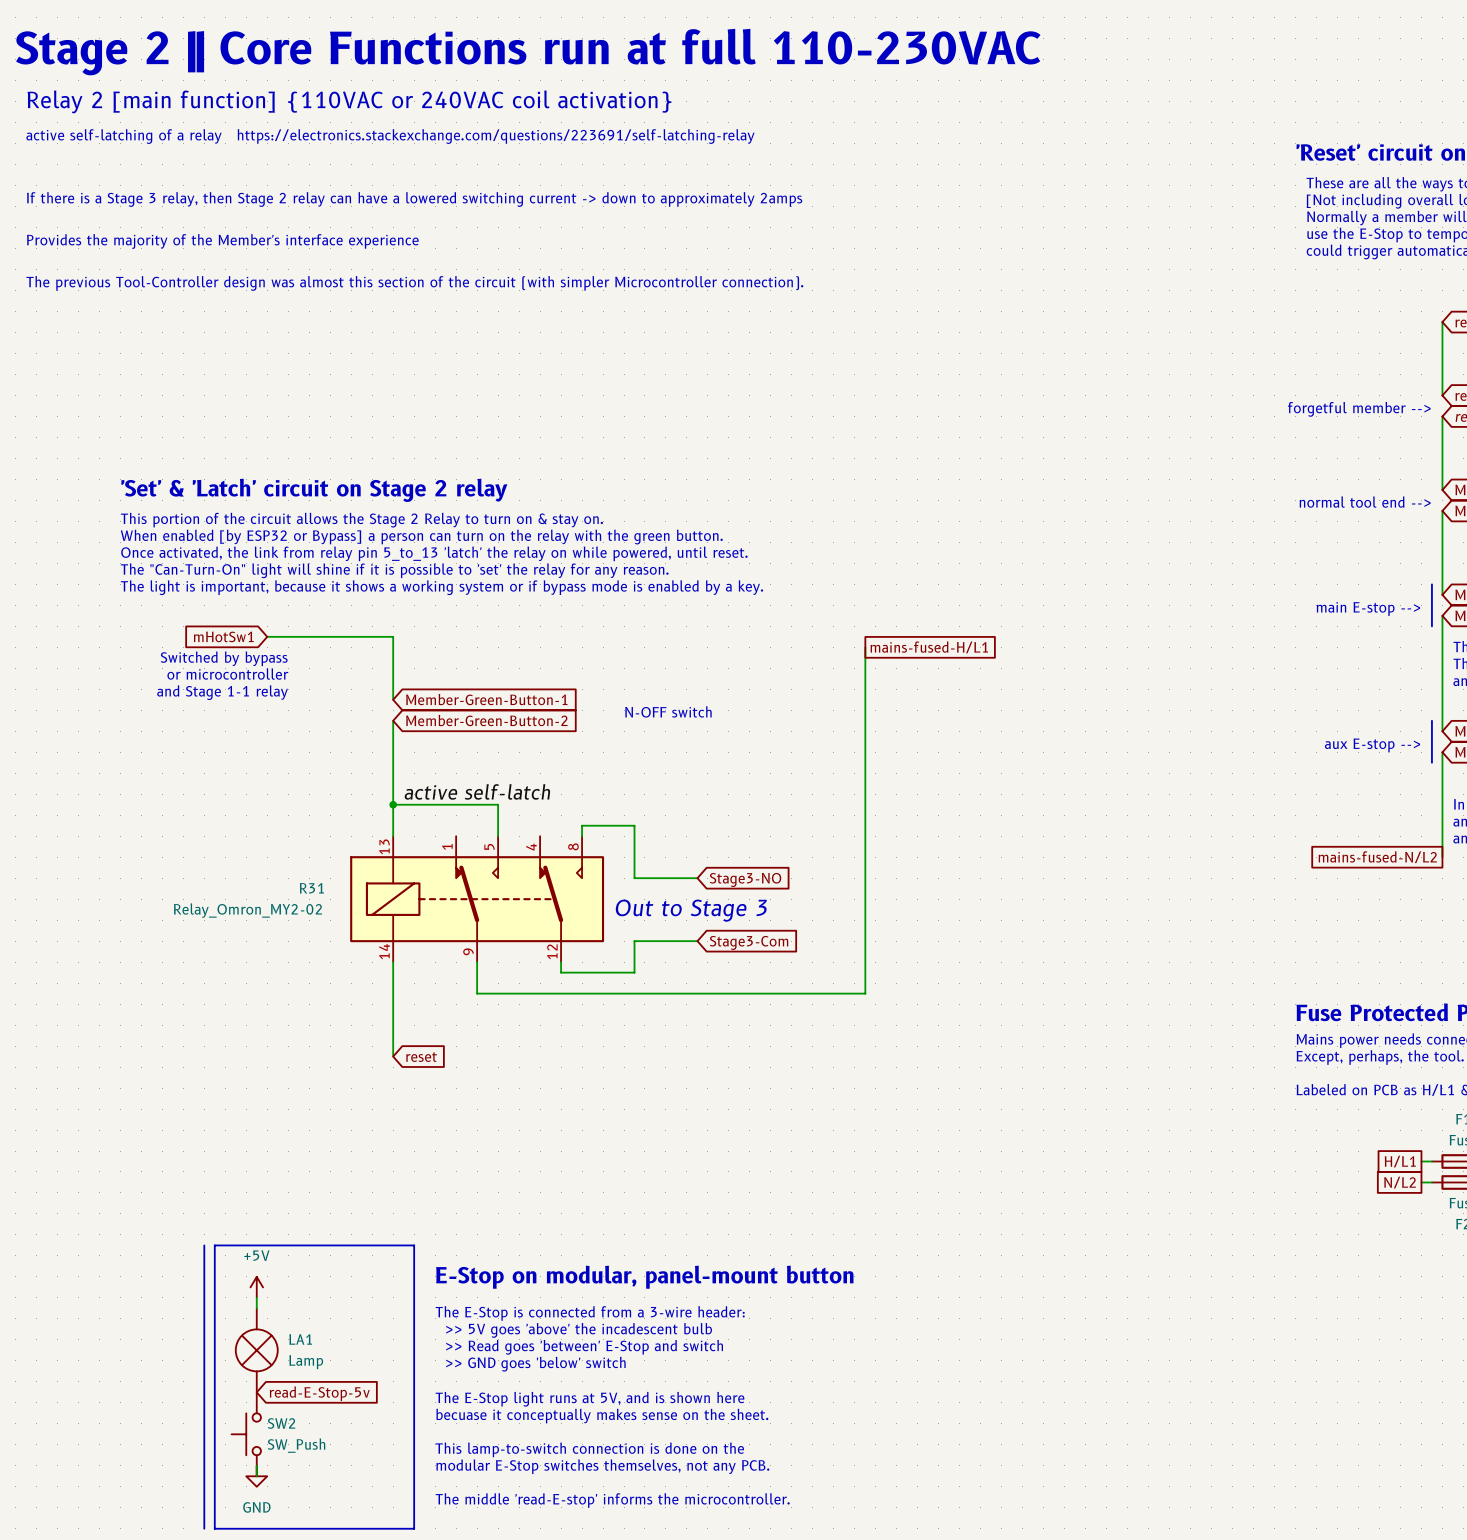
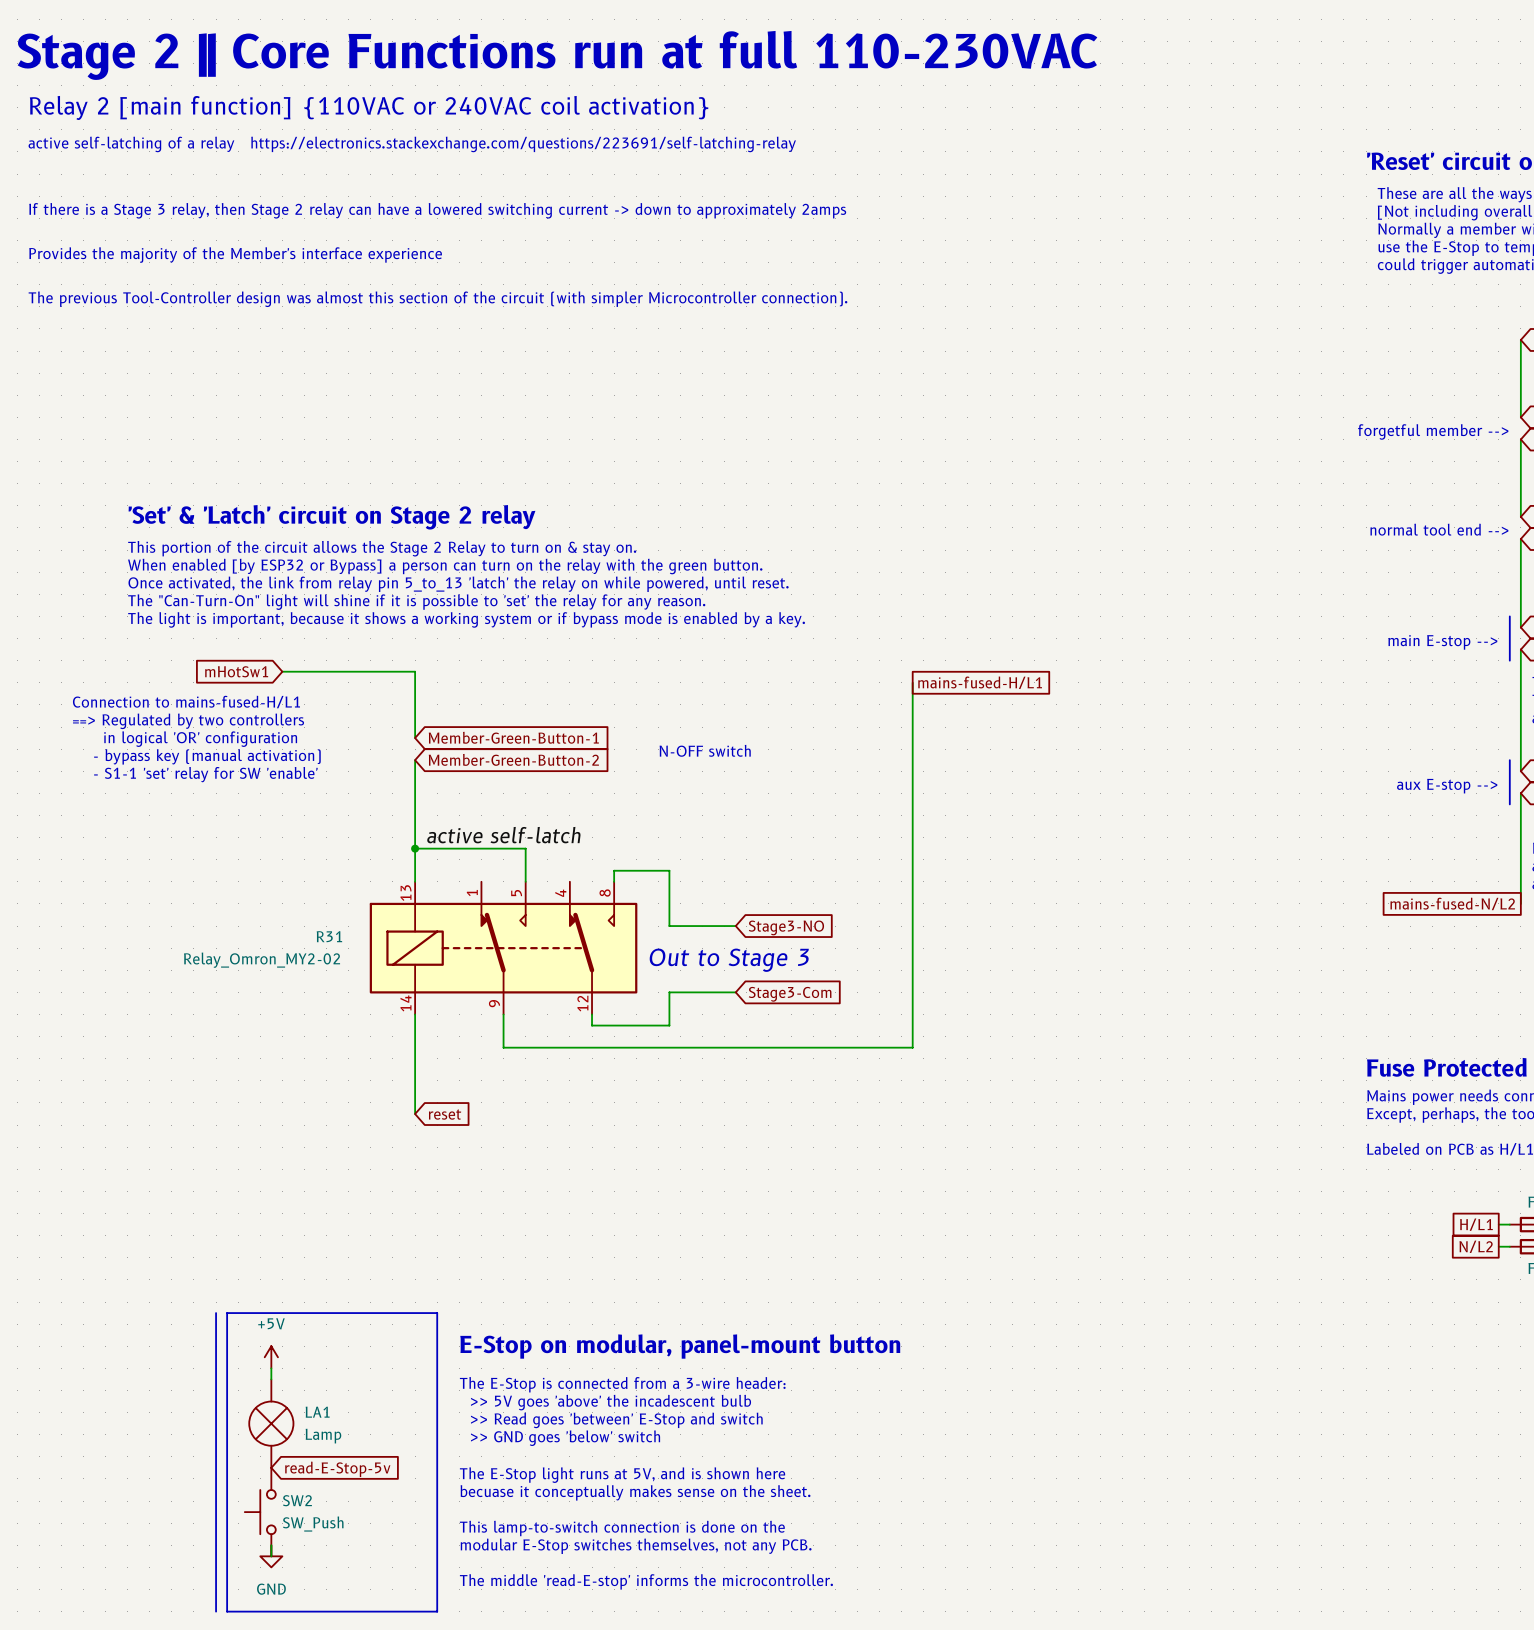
text: Switched by bypass (224, 658) -> none
text: none -> Connection to mains-fused-H/L1 (186, 702)
text: or microcontroller (227, 674) -> none
text: none -> ==> Regulated by two controllers (188, 721)
text: and Stage 1-1 relay (222, 692) -> none
text: none -> in logical 'OR' configuration (200, 739)
text: none -> - bypass key (manual activation) (207, 756)
text: none -> - S1-1 'set' relay for SW 'enable' (205, 774)

